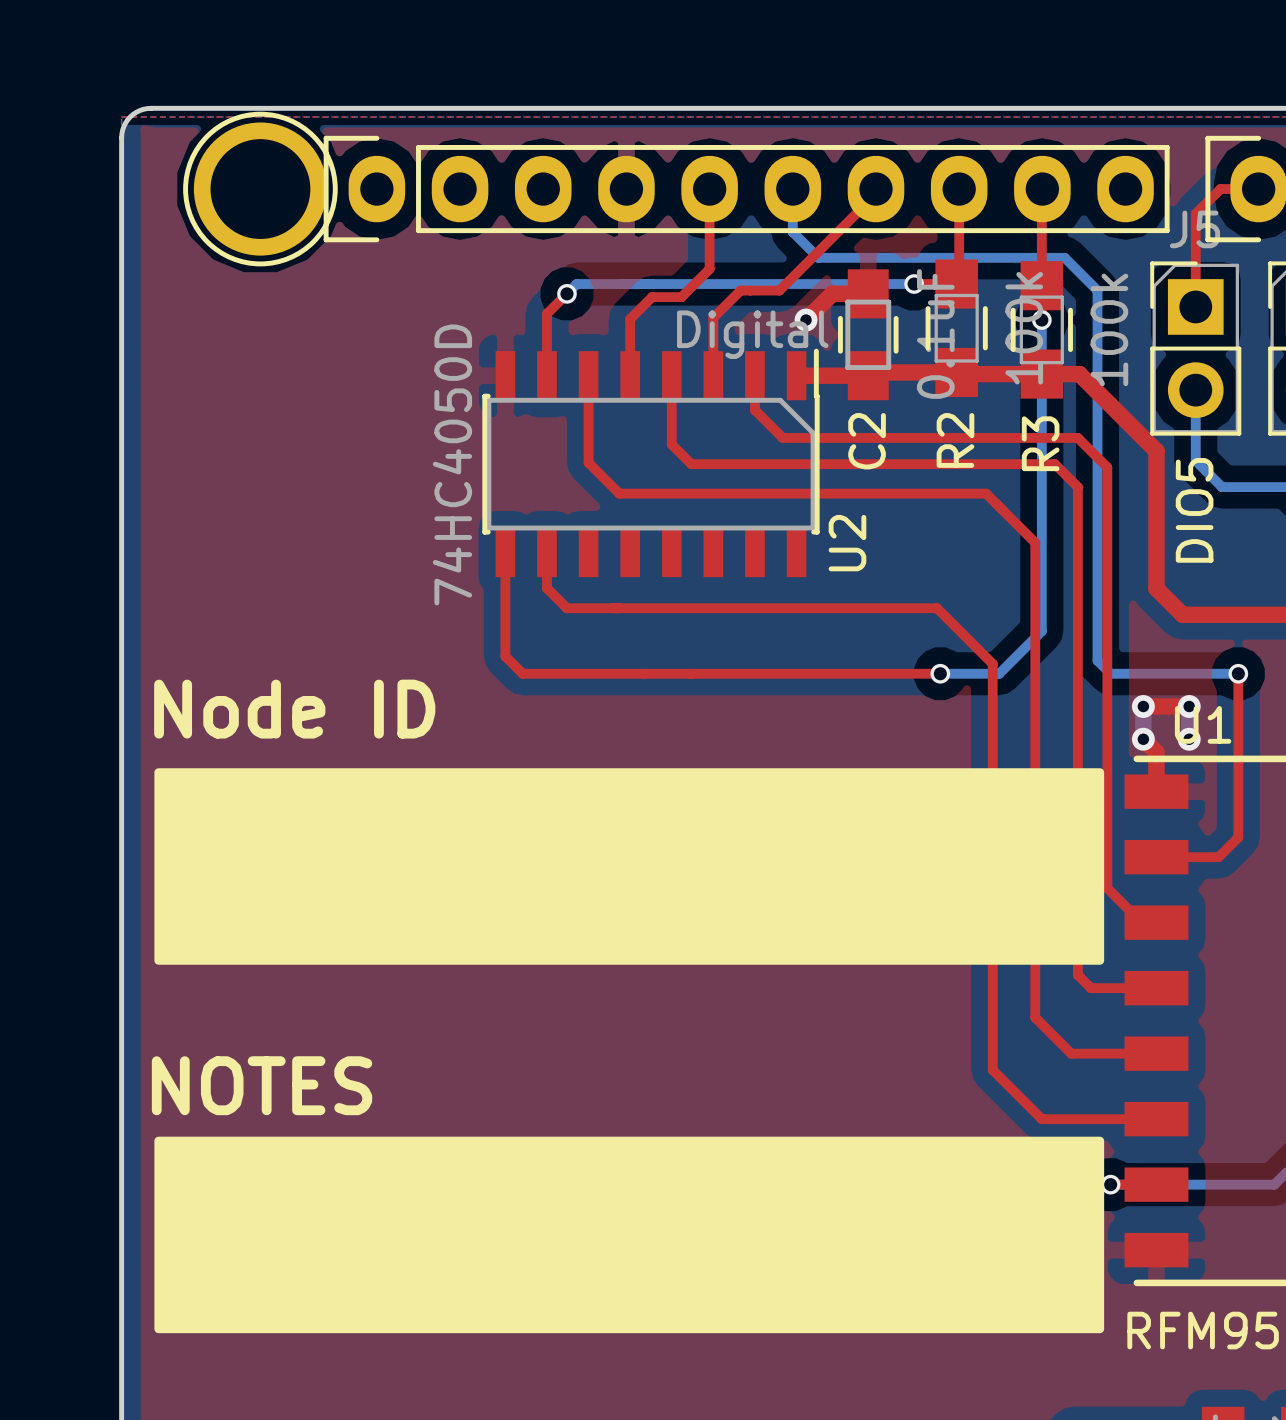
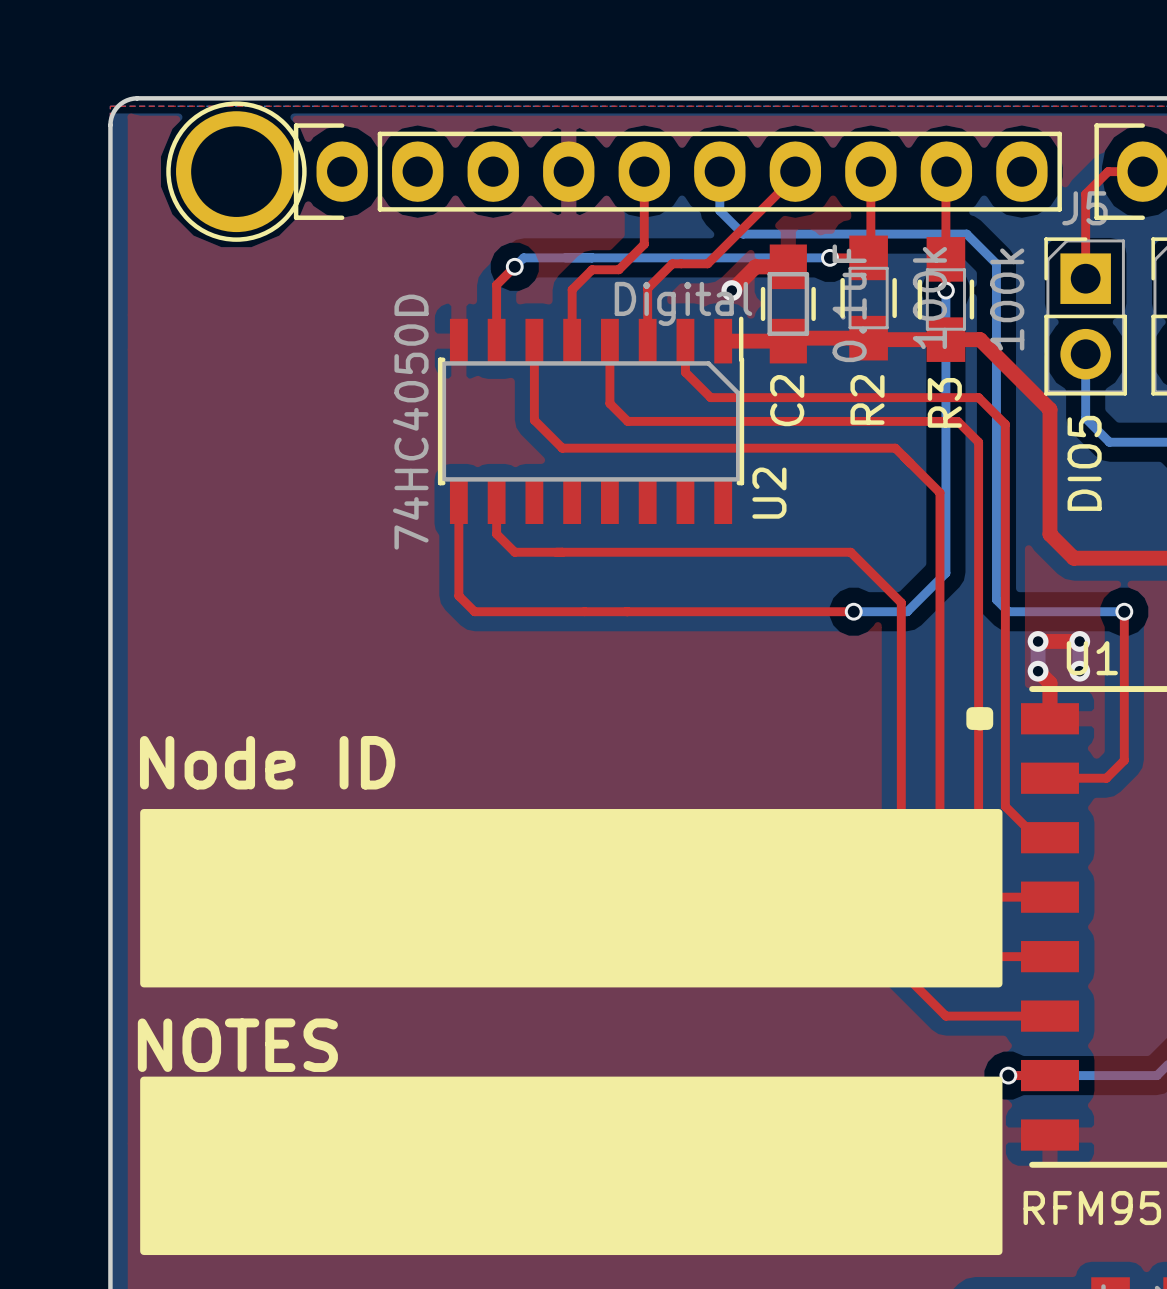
text position: Node ID (294, 709) -> Node ID (267, 762)
drawing: [154, 768, 1105, 965] -> none
drawing: none -> [140, 809, 1003, 988]
text position: NOTES (261, 1085) -> NOTES (237, 1045)
drawing position: (629, 1234) -> (571, 1165)

